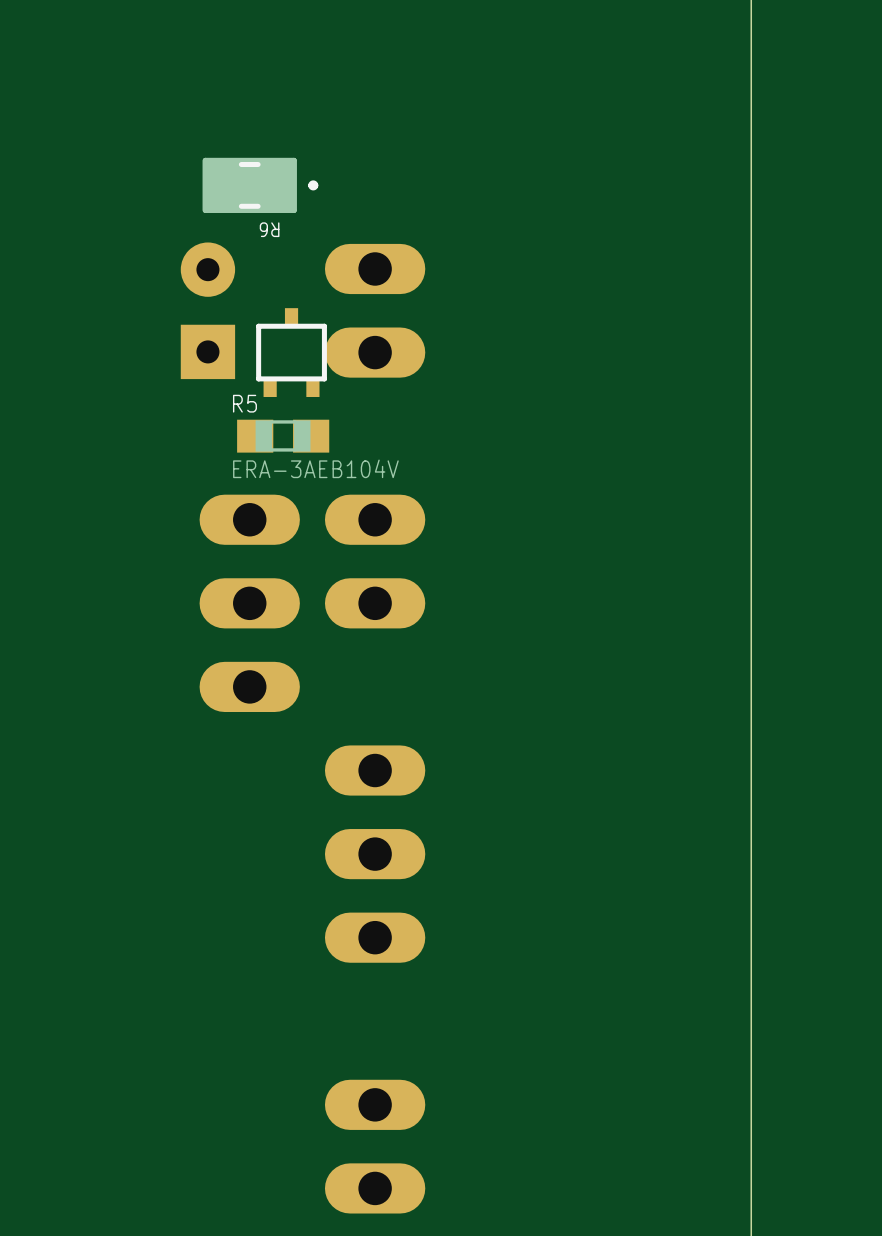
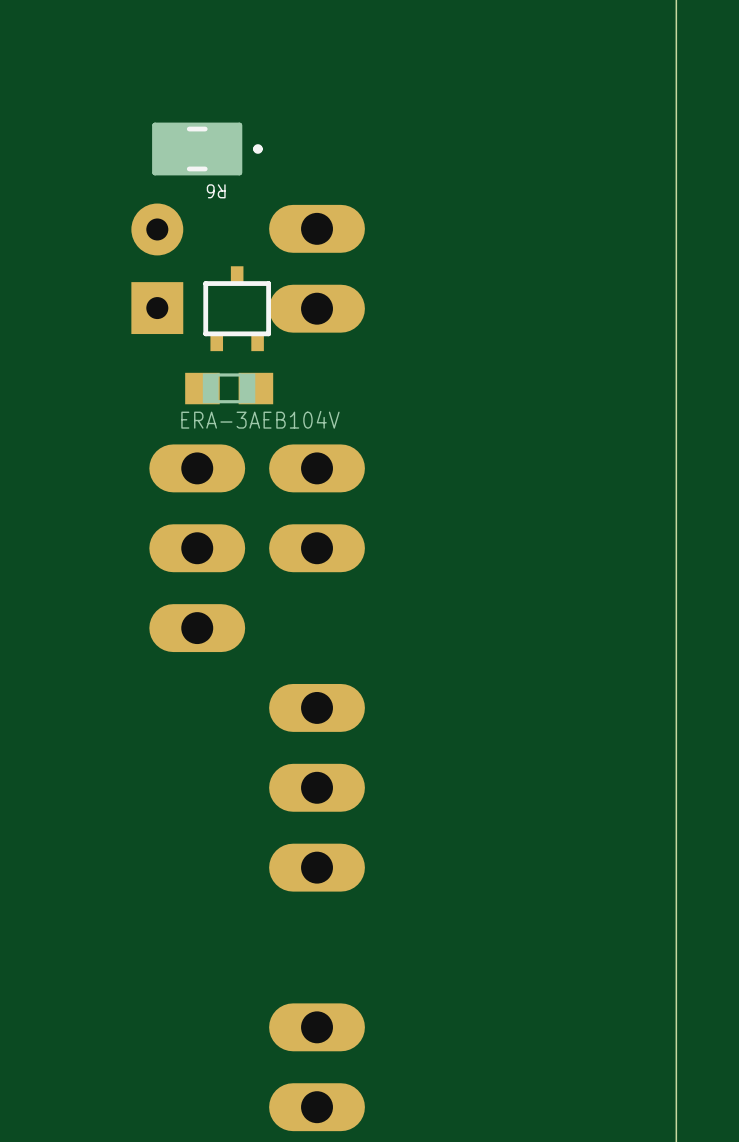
R5 name: R5 (244, 403) -> none

